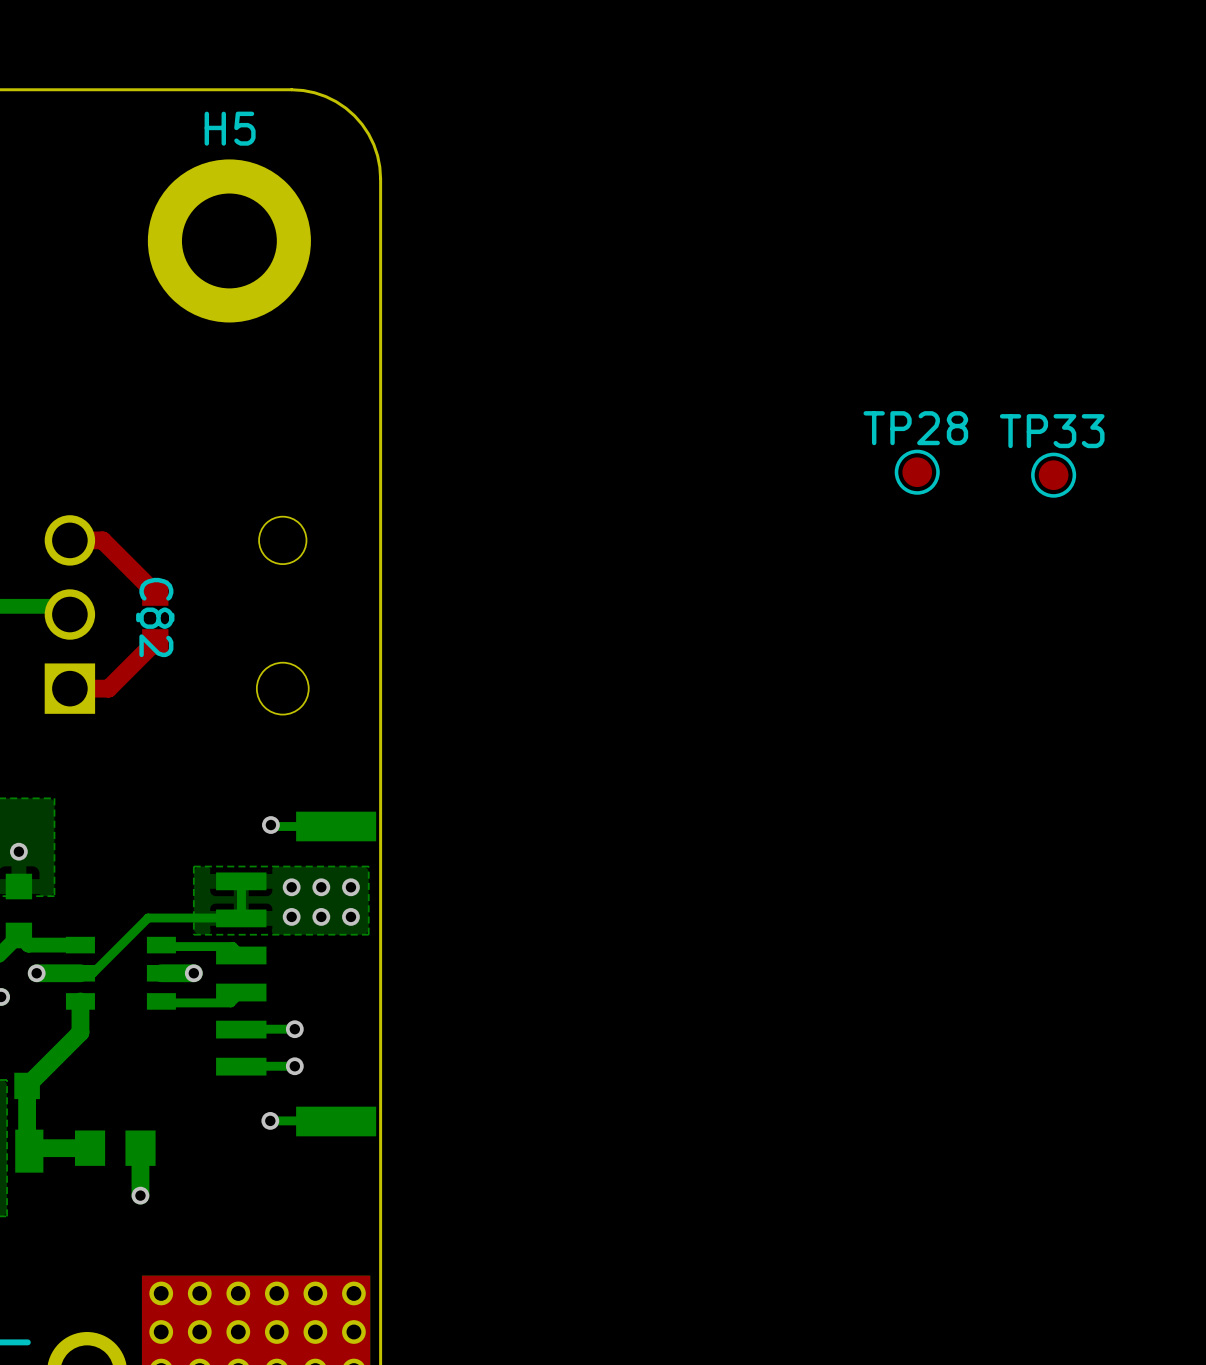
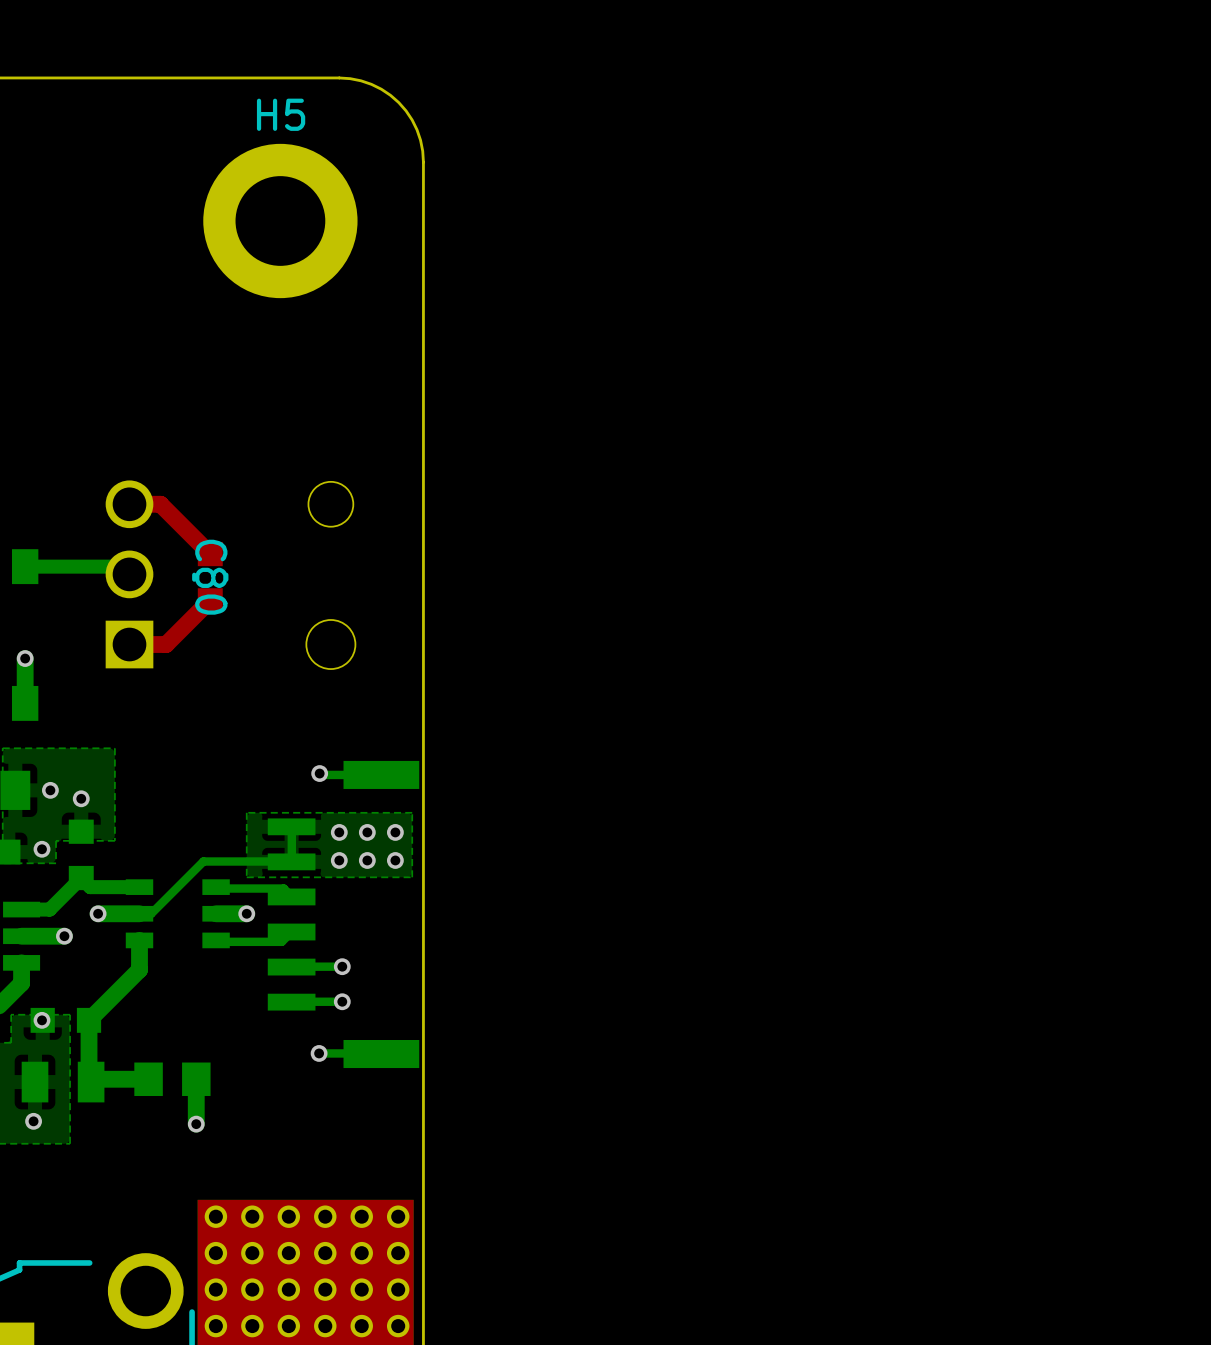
TP28: (917, 472) -> none
TP33: (1053, 475) -> none
C82 name: C82 (156, 617) -> C80 (211, 577)

